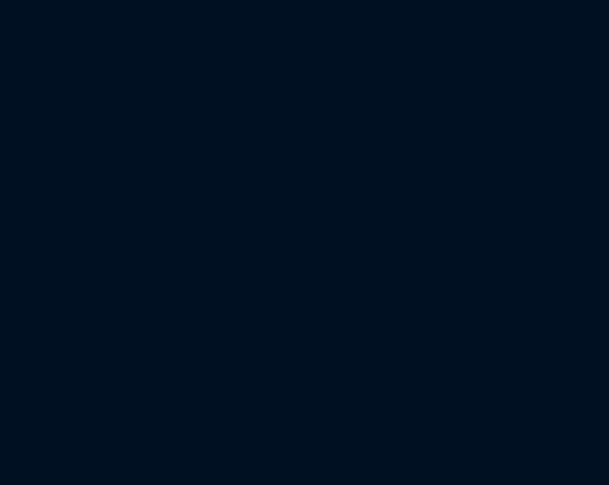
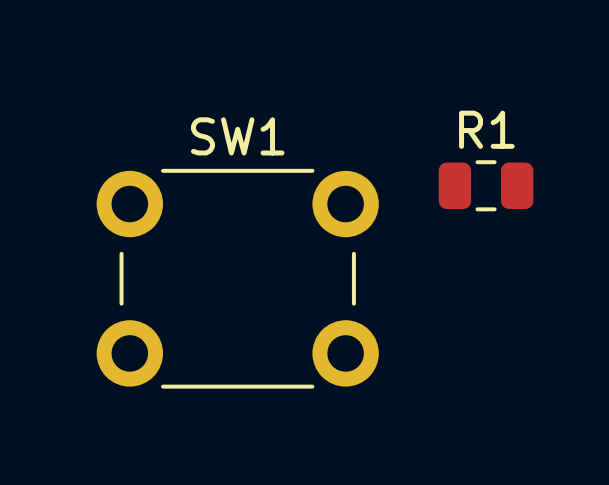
R1: none -> (486, 185)
SW1: none -> (237, 278)

